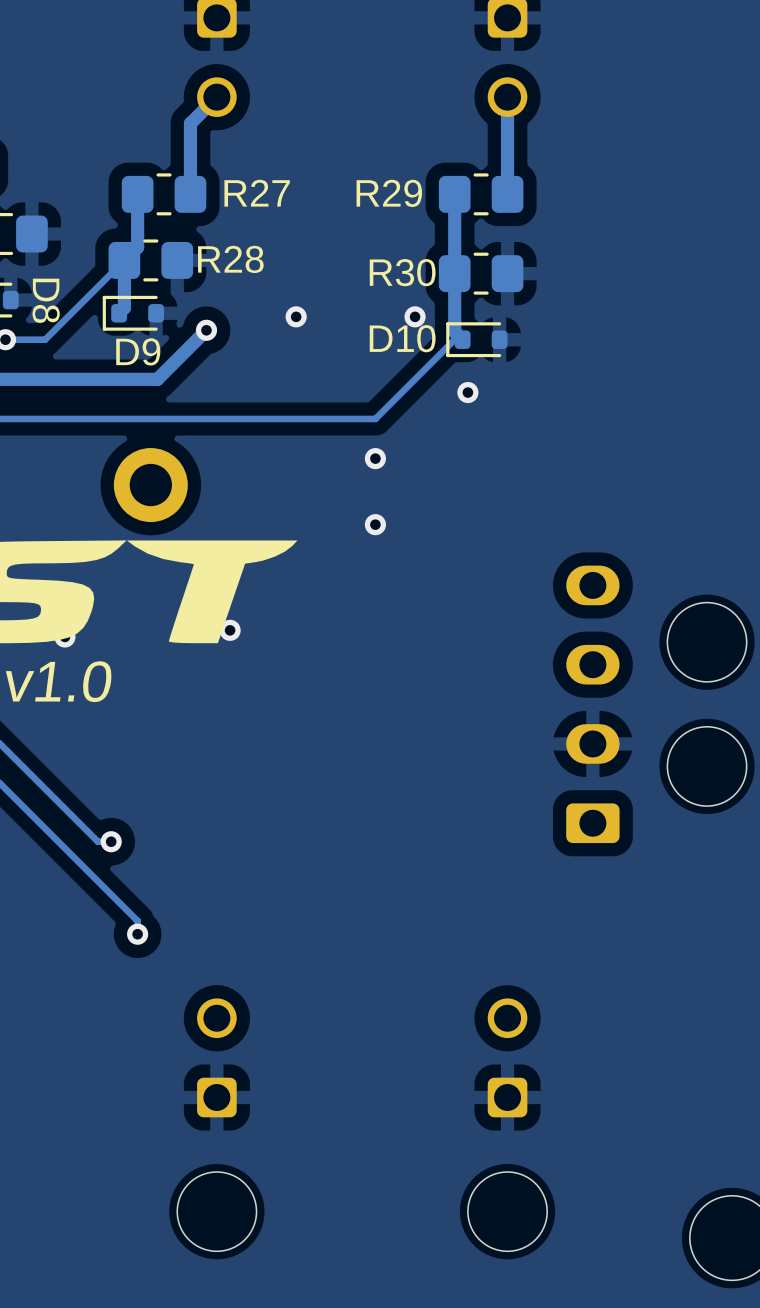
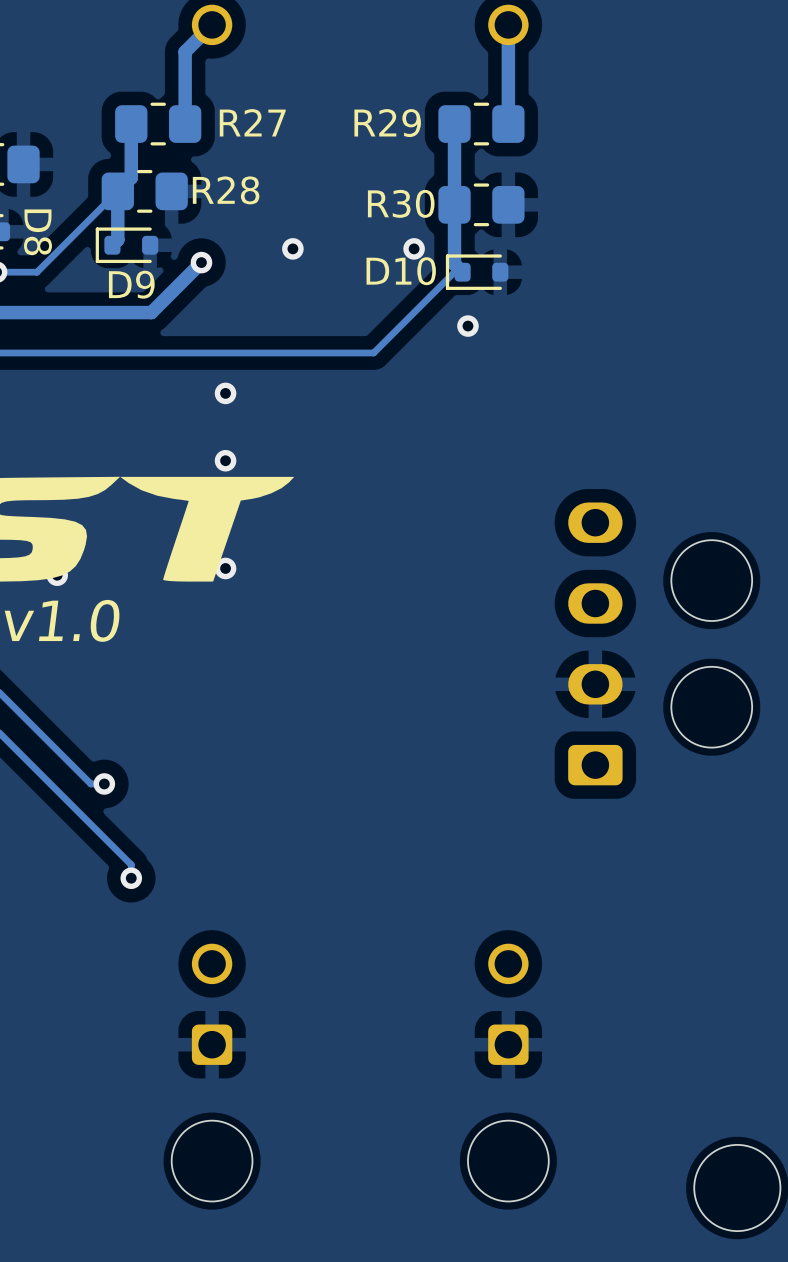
via: none -> (225, 393)
via: (375, 458) -> none
part: (150, 485) -> none
via: none -> (225, 460)
via: (375, 524) -> none

